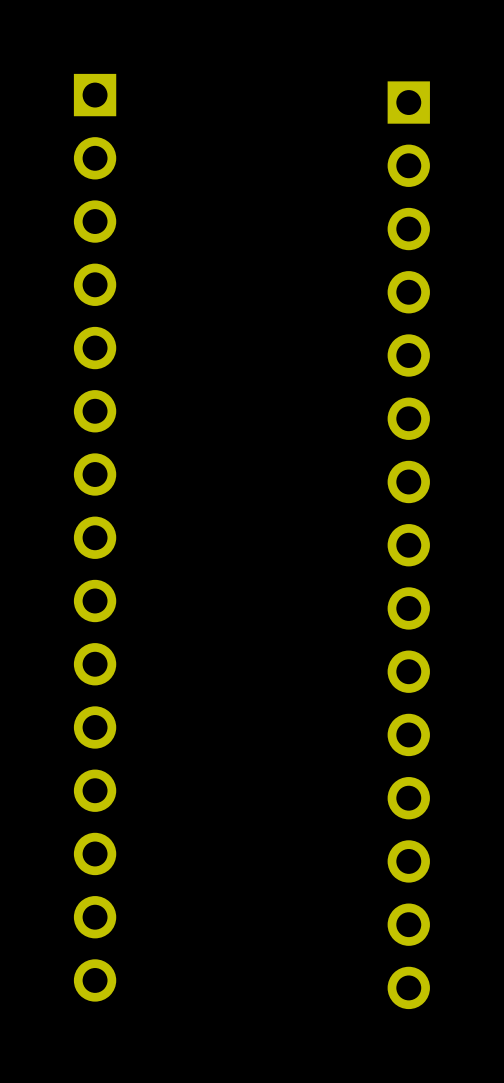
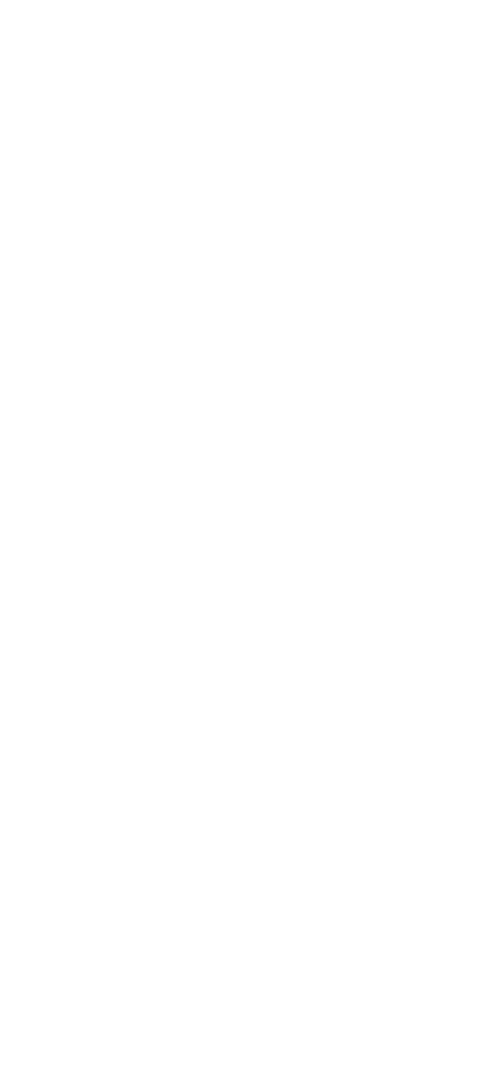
part: (95, 537) -> none
part: (408, 545) -> none

